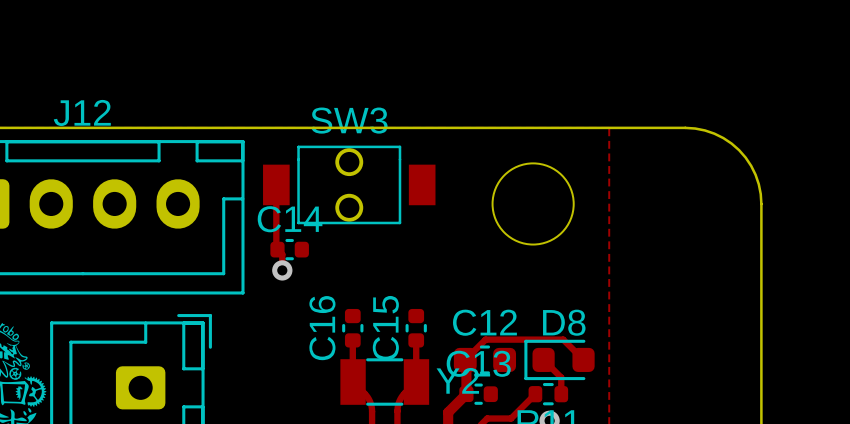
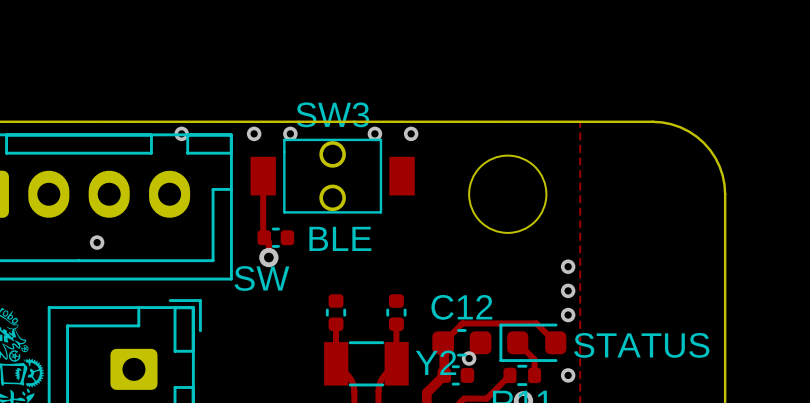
J12 name: J12 (82, 112) -> none
via: none -> (181, 133)
via: none -> (254, 133)
via: none -> (290, 133)
via: none -> (374, 133)
via: none -> (411, 133)
C14 name: C14 (290, 219) -> none
text: none -> BLE (340, 238)
via: none -> (97, 242)
via: none -> (568, 266)
text: none -> SW (261, 278)
via: none -> (568, 290)
D8 name: D8 (564, 322) -> none
C16 name: C16 (322, 328) -> none
C15 name: C15 (385, 328) -> none
via: none -> (568, 315)
text: none -> STATUS (641, 345)
C13 name: C13 (478, 363) -> none
via: none -> (469, 358)
via: none -> (568, 375)

